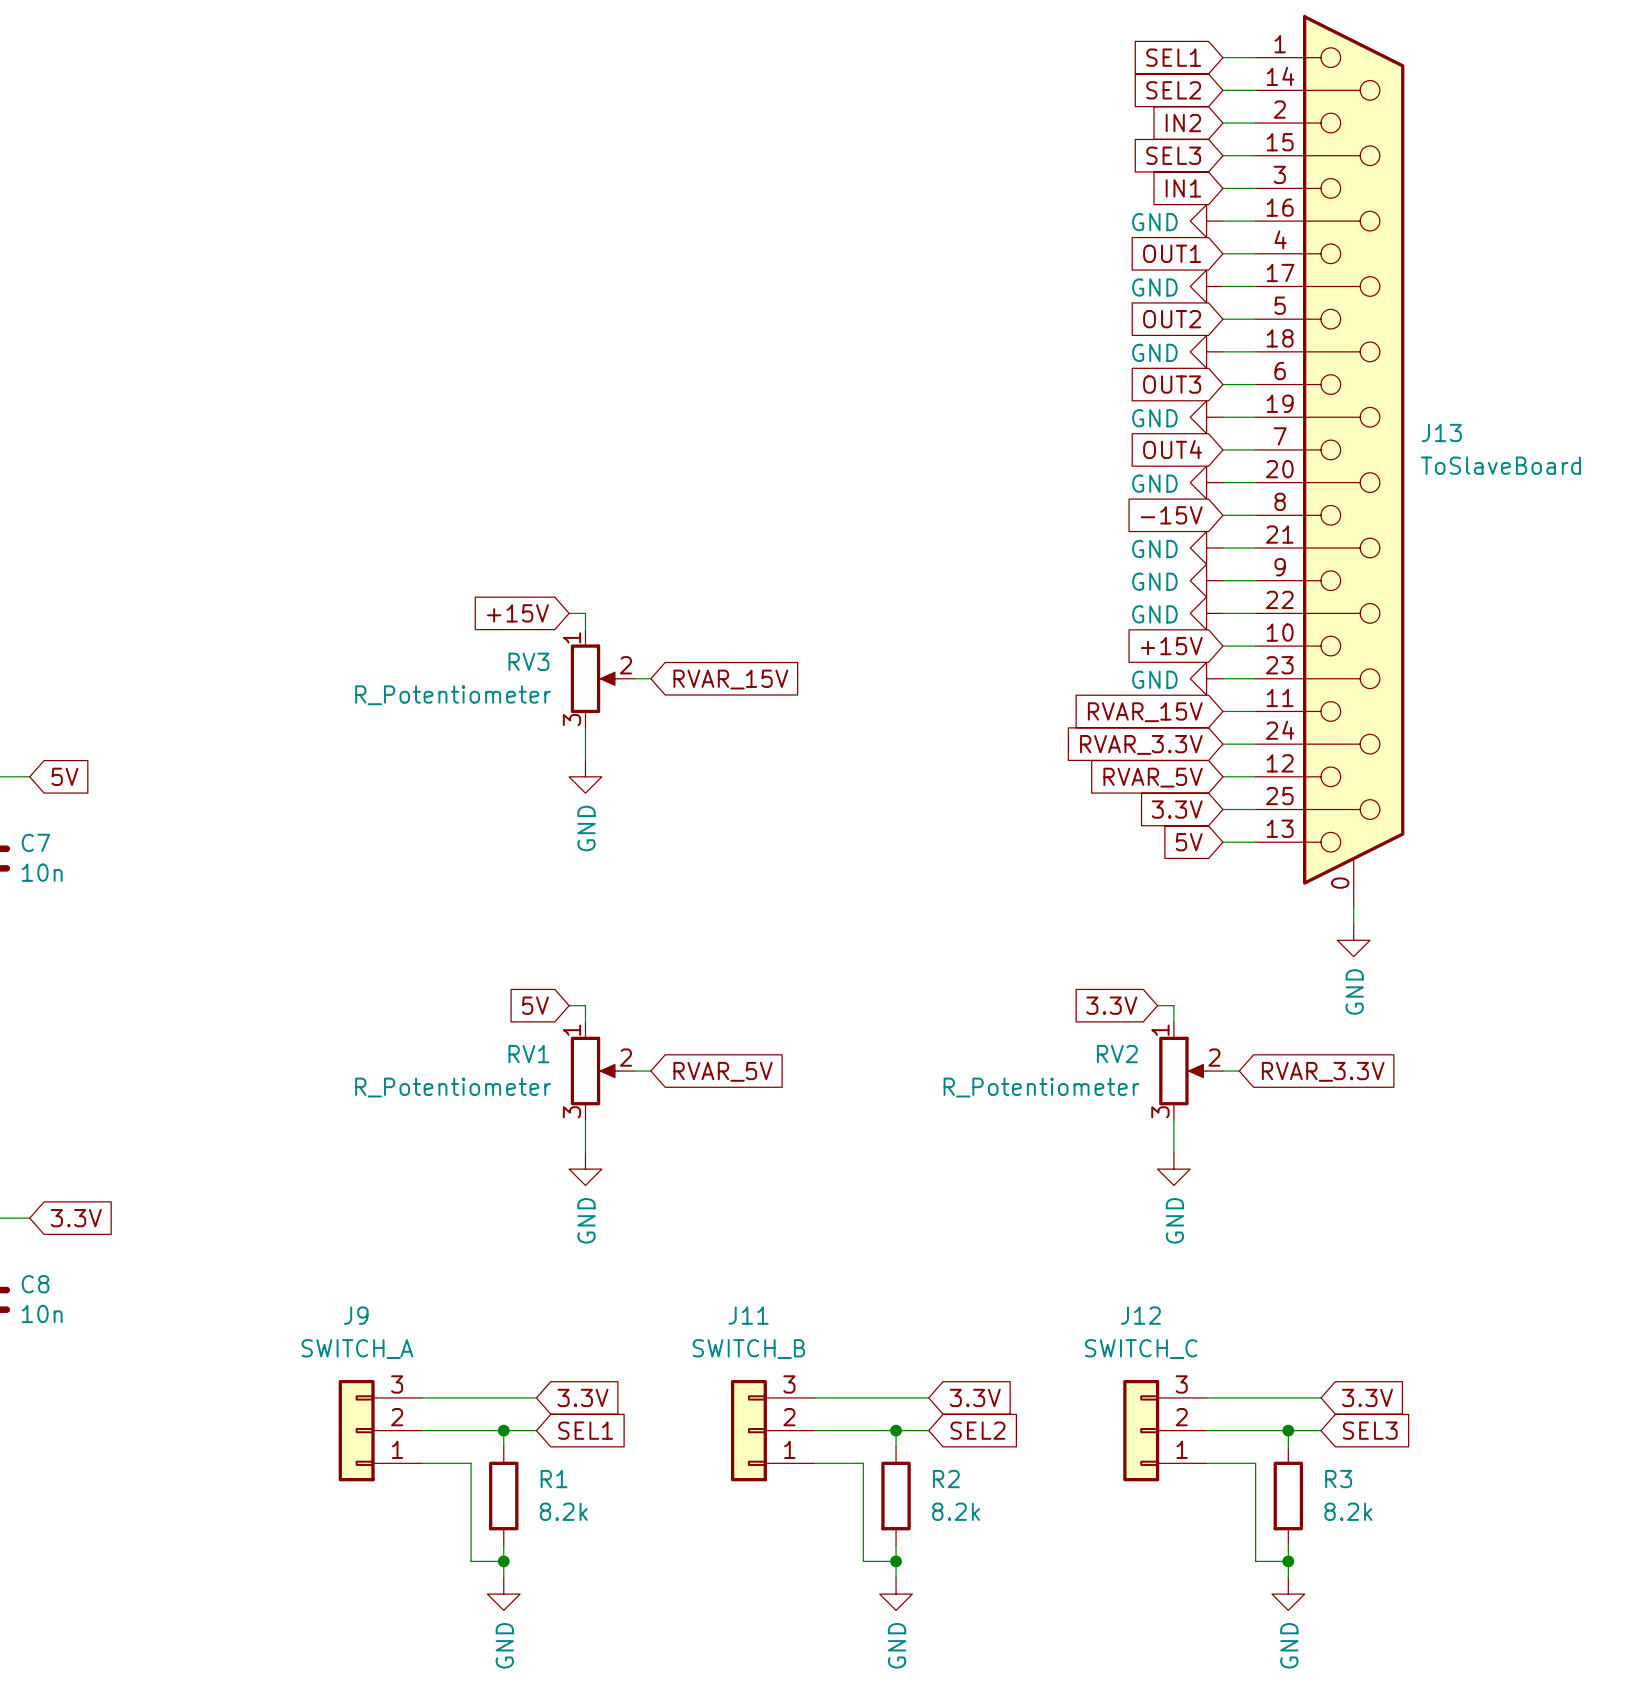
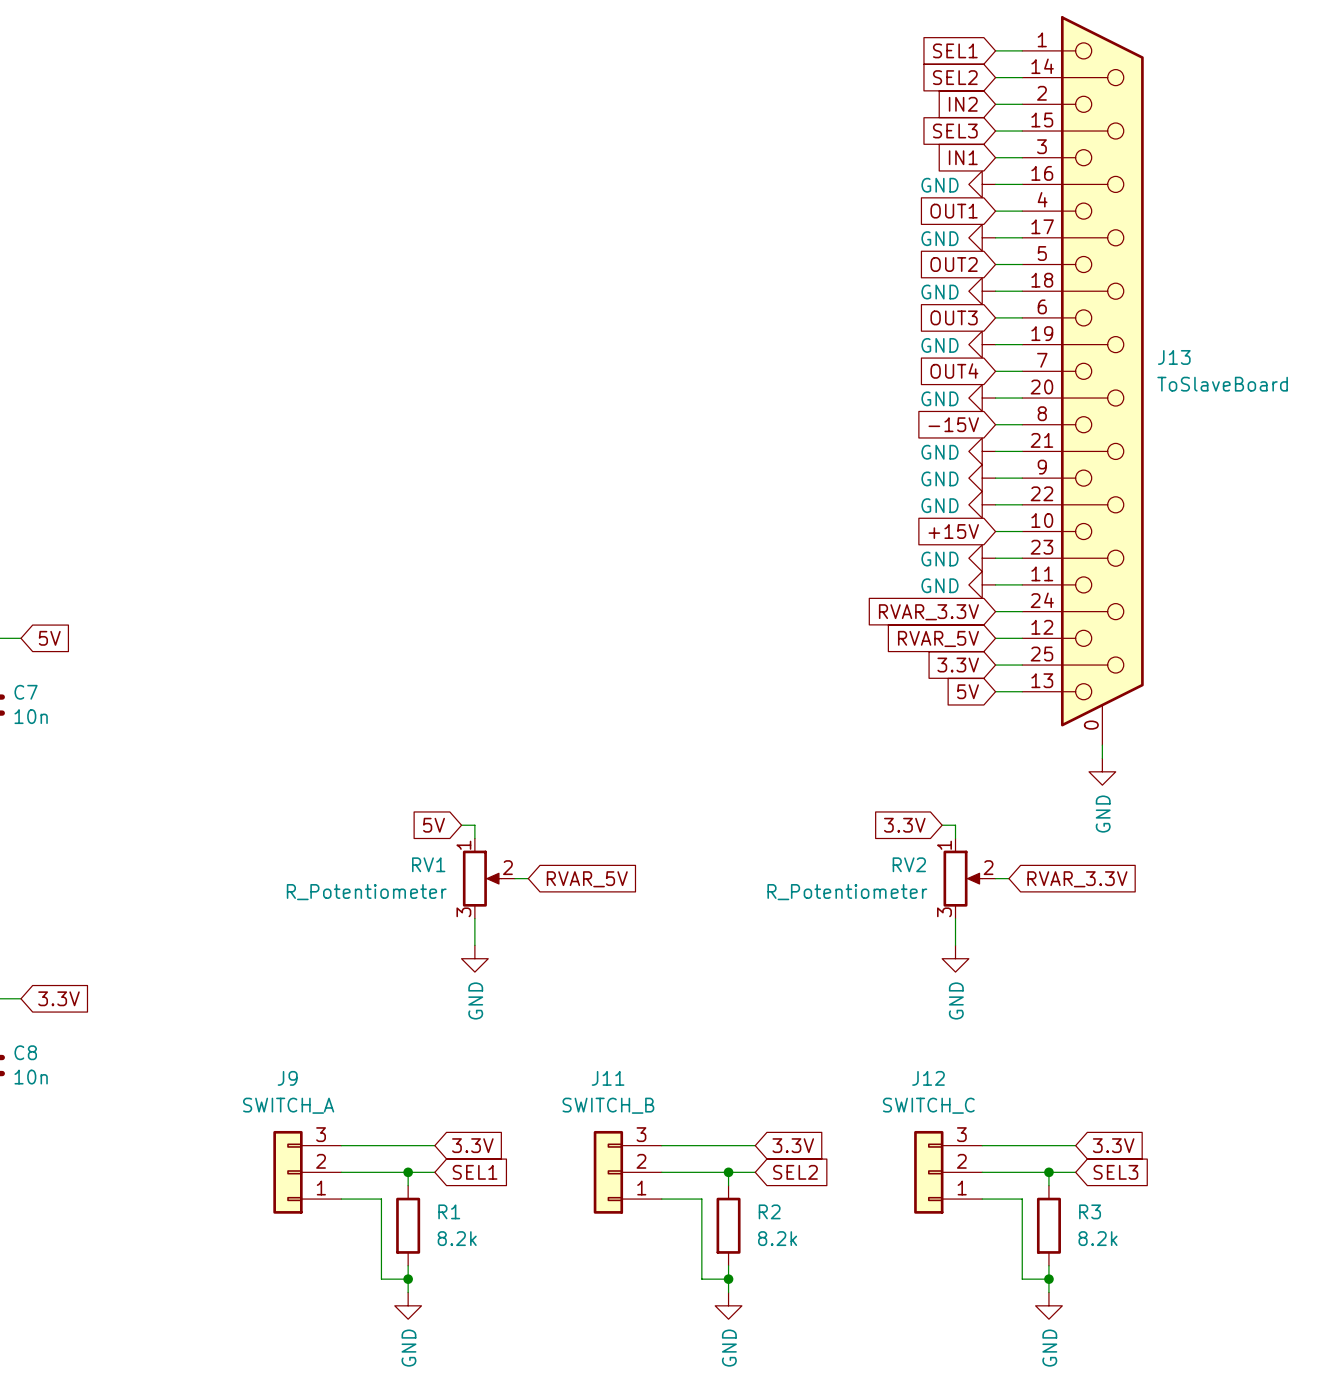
global label: +15V (517, 613) -> none
wire: (569, 613) (585, 613) (585, 629) -> none
RV3: R_Potentiometer (602, 678) -> none
wire: (634, 678) (650, 678) -> none
global label: RVAR_15V (730, 679) -> none
power symbol: none -> GND (982, 584)
global label: RVAR_15V (1145, 712) -> none
wire: (585, 727) (585, 760) -> none
power symbol: GND (585, 776) -> none

